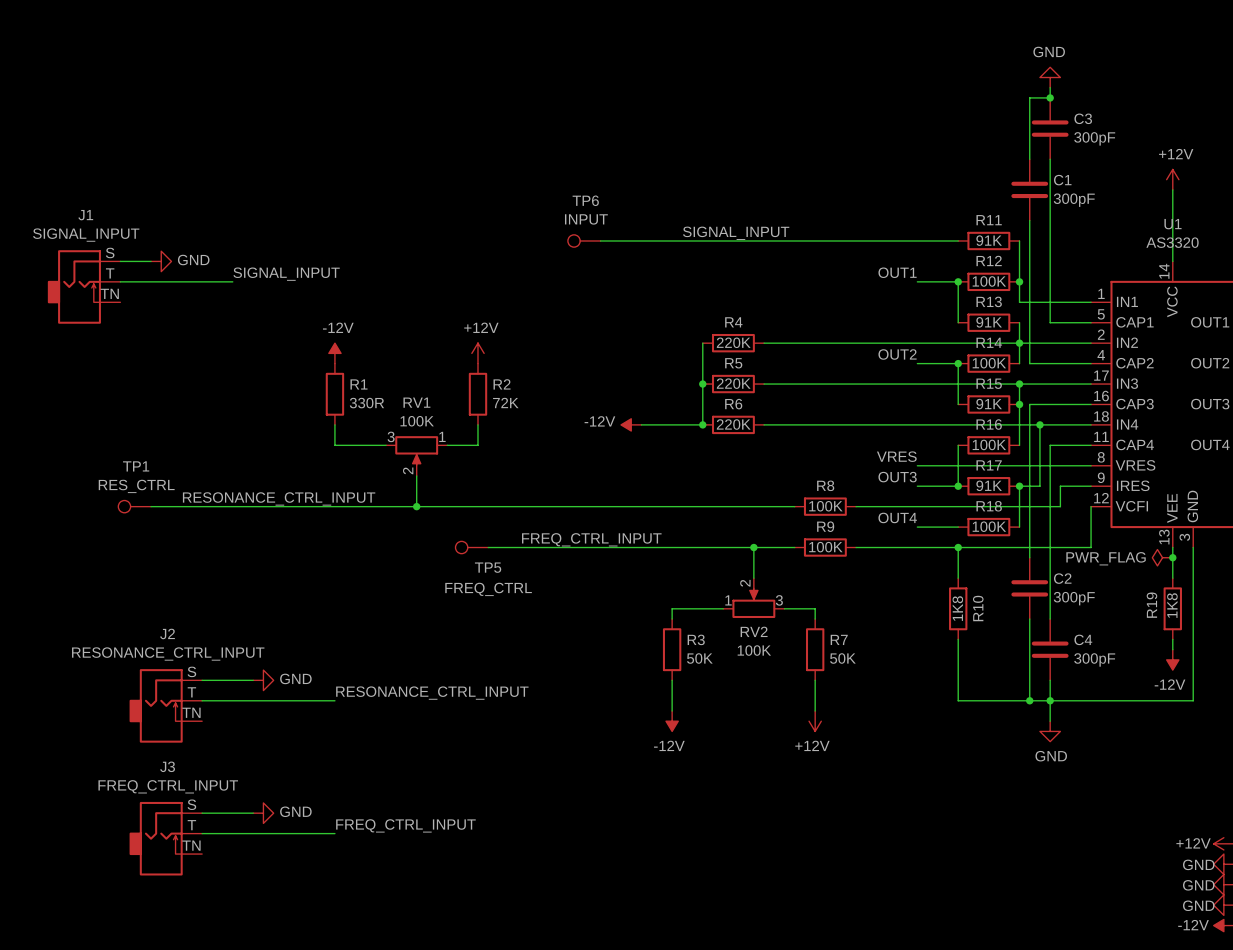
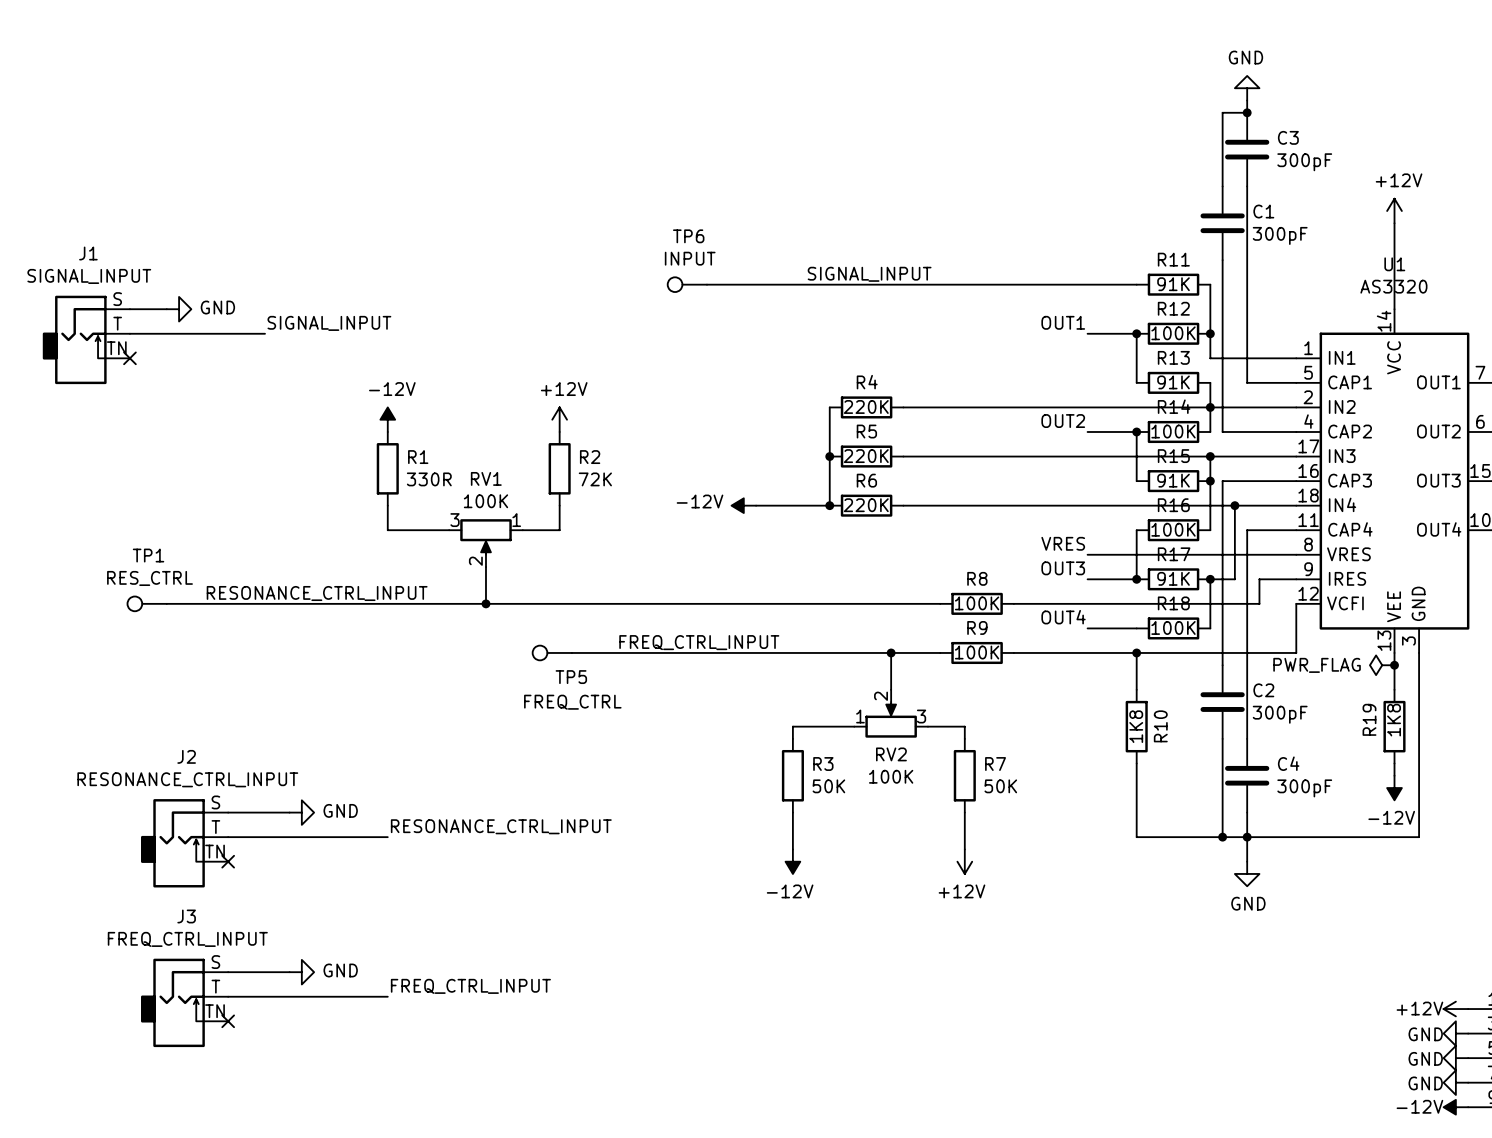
no-connect mark: none -> (129, 358)
no-connect mark: none -> (228, 861)
no-connect mark: none -> (228, 1021)

